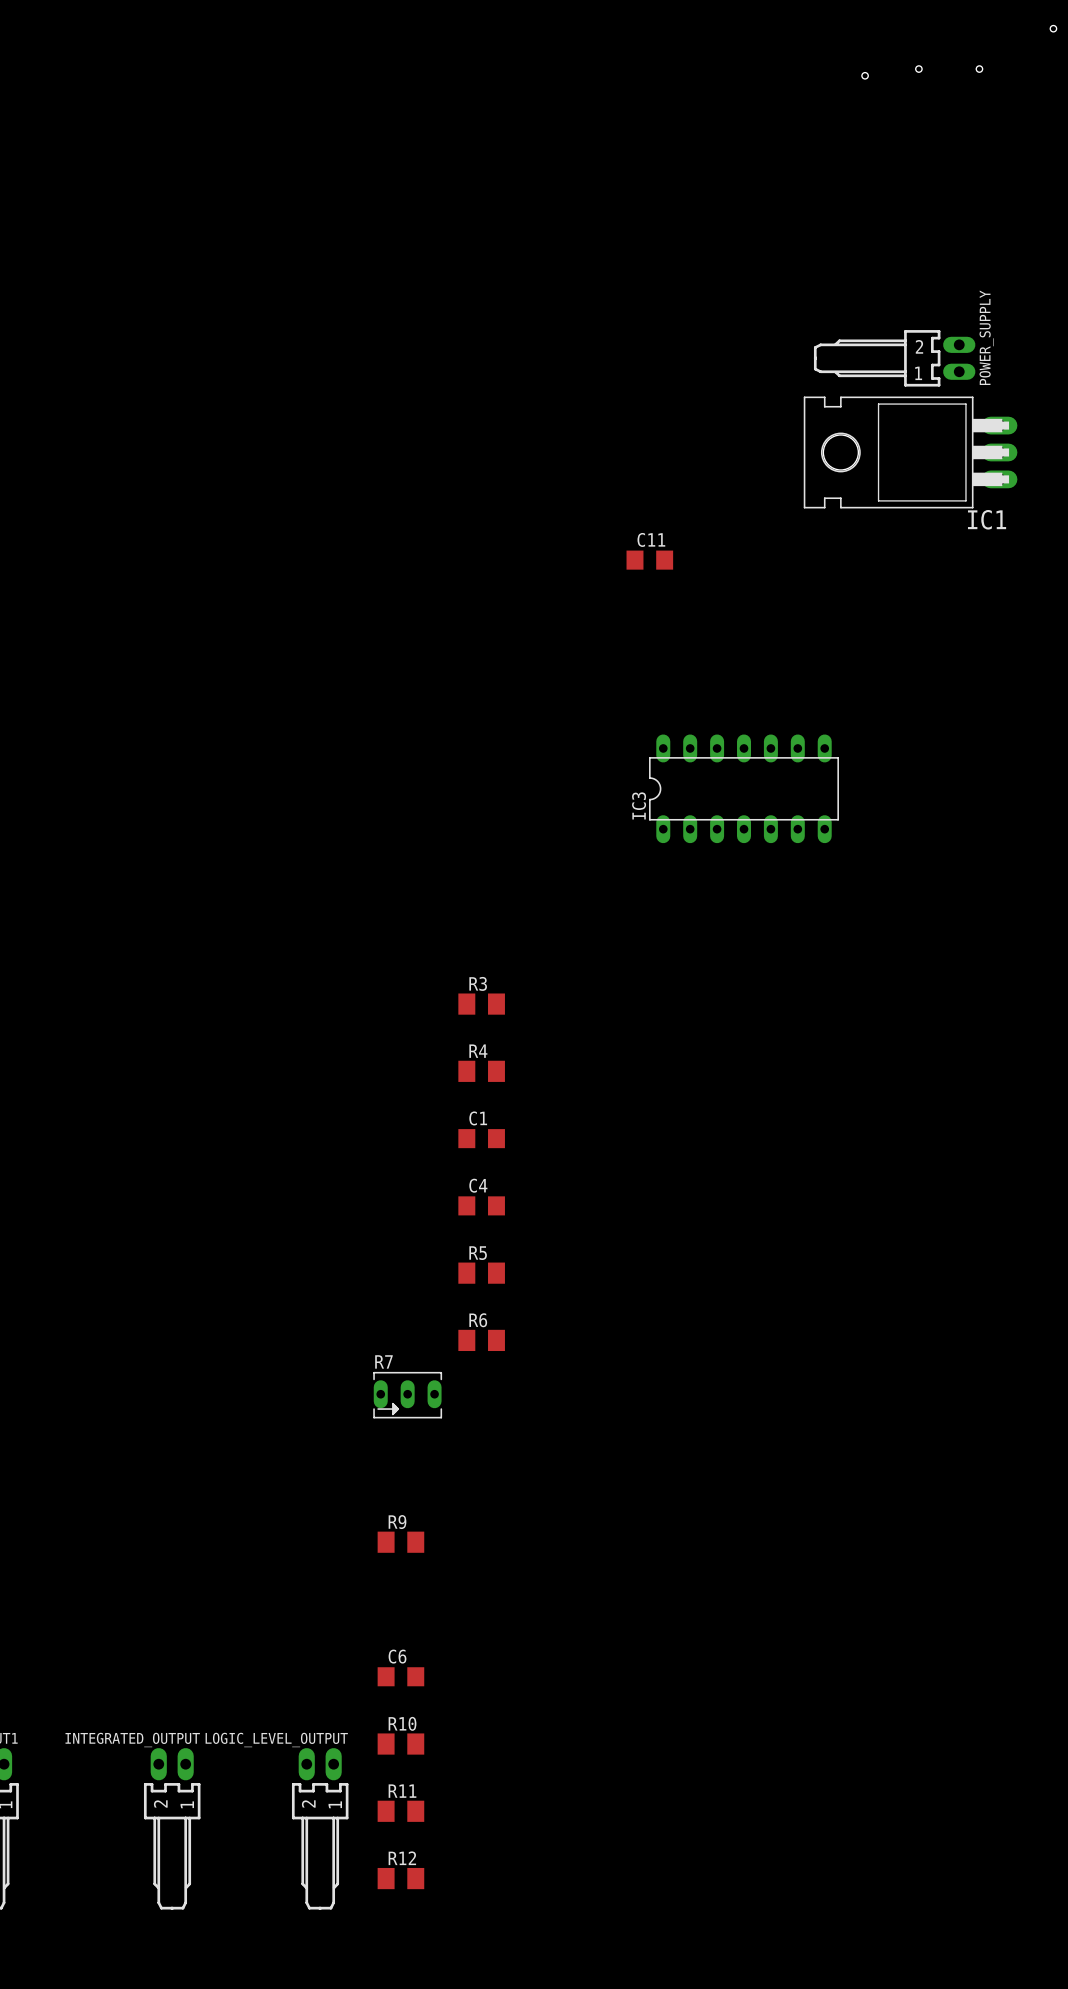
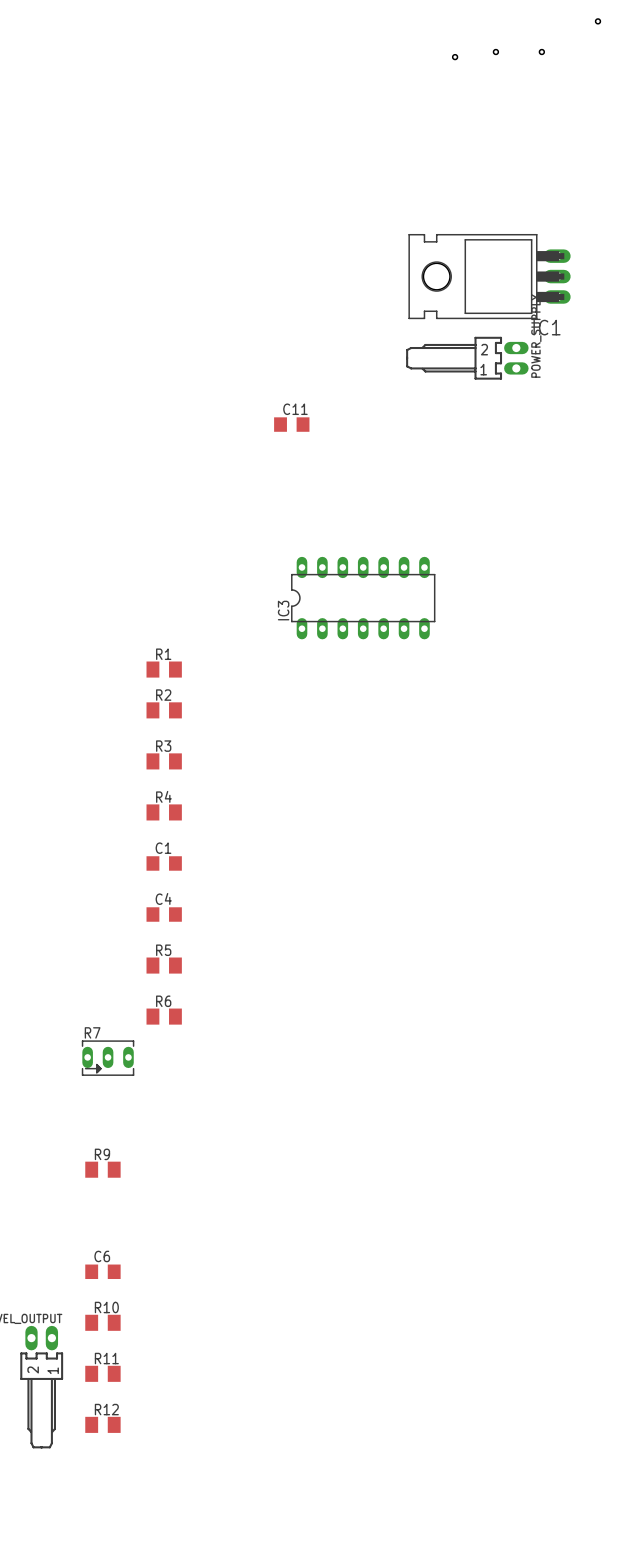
POWER_SUPPLY position: (894, 358) -> (467, 358)
IC1 position: (910, 452) -> (489, 276)
R1: none -> (164, 669)
R2: none -> (164, 710)

